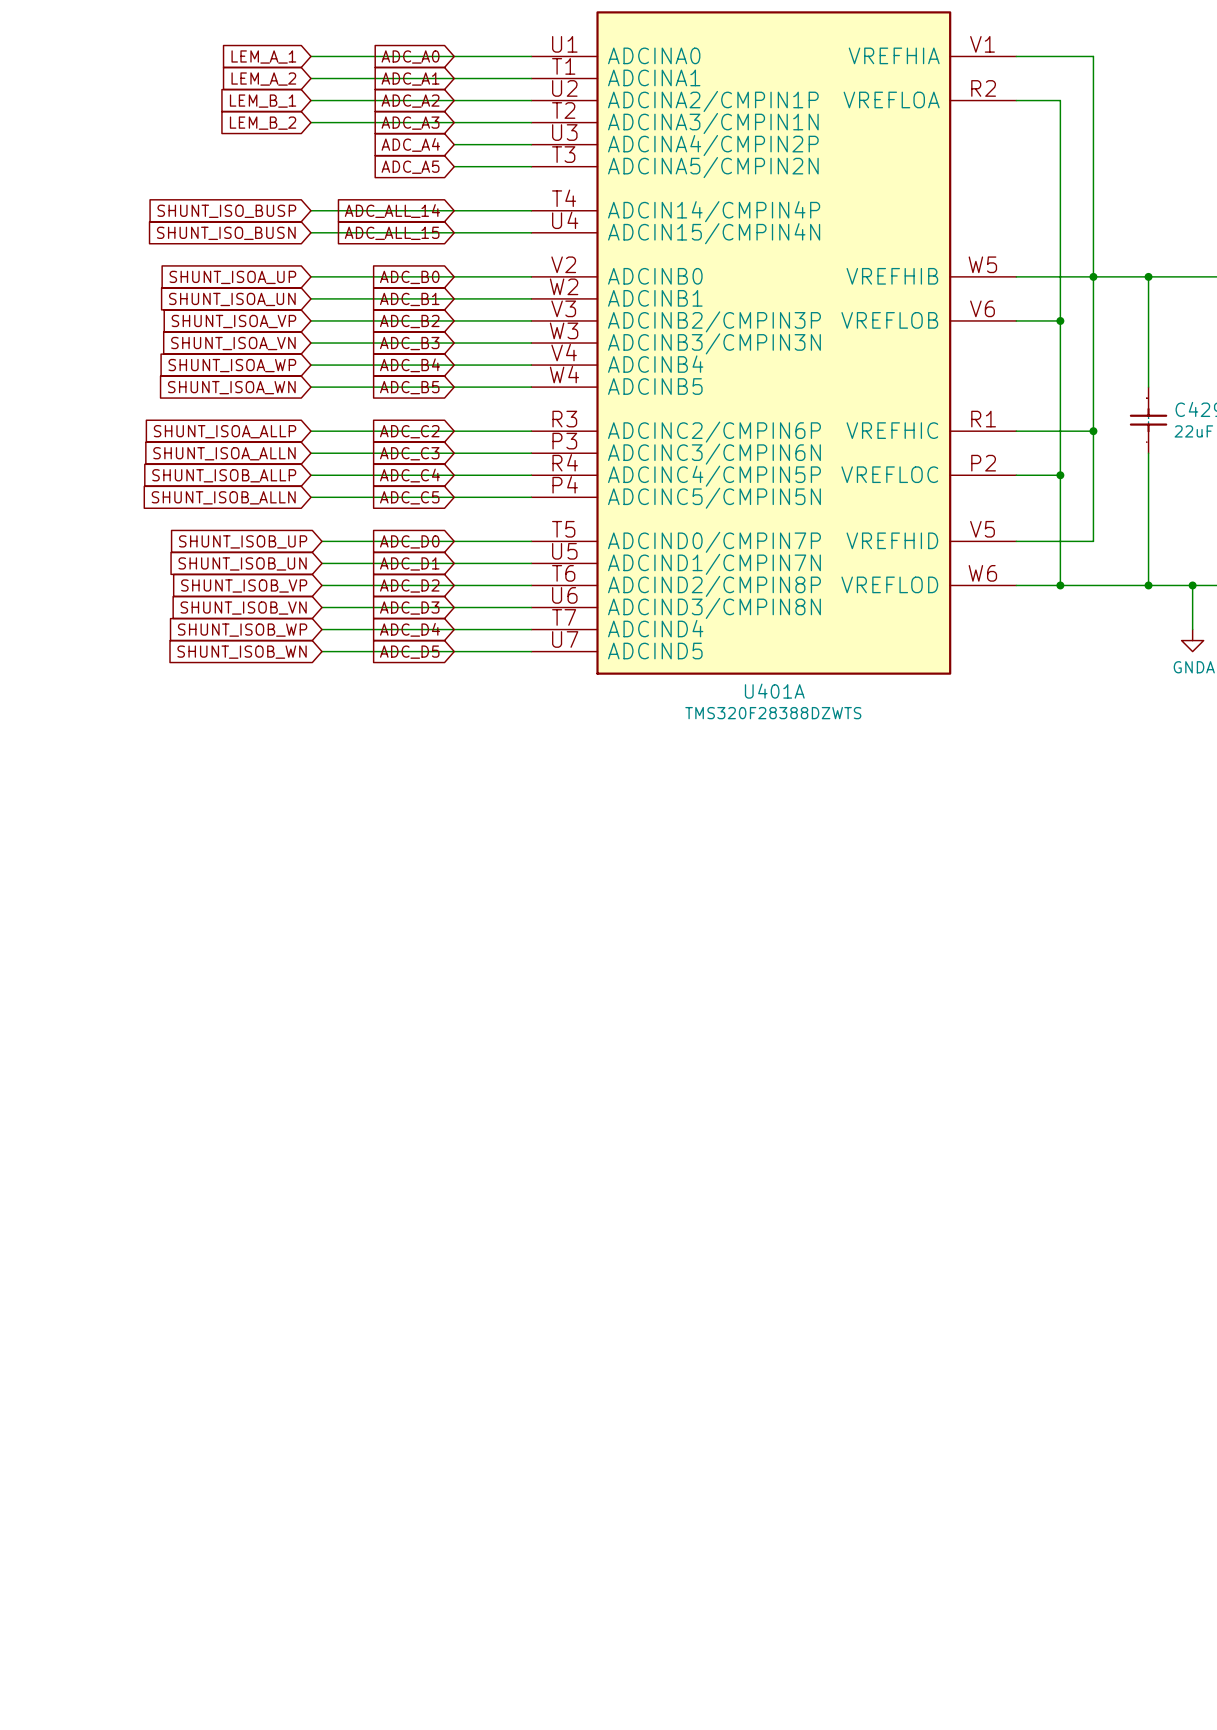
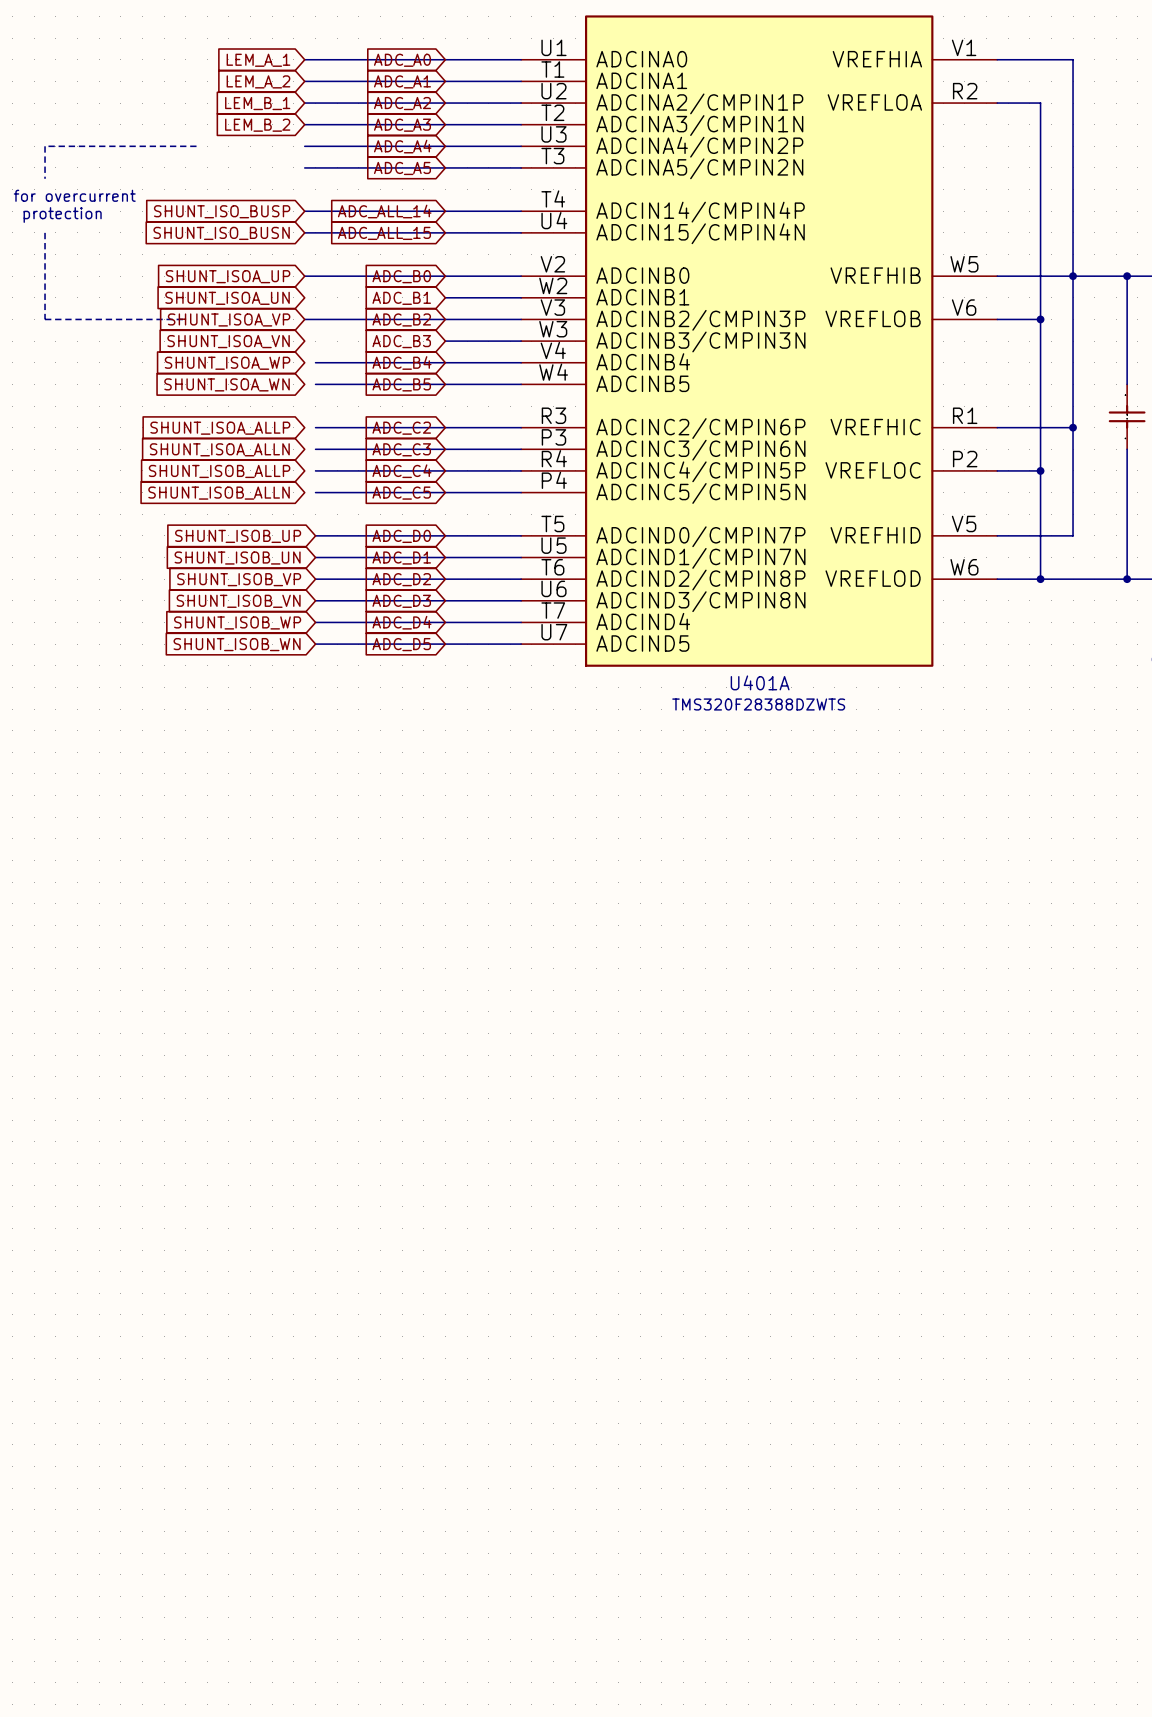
line: none -> (196, 146) (45, 146) (45, 178)
text: none -> for overcurrent (74, 195)
text: none -> protection (62, 215)
line: none -> (45, 232) (45, 319) (185, 319)
wire: (310, 298) (454, 298) -> (304, 167) (445, 167)
wire: (310, 343) (454, 343) -> (304, 146) (445, 146)
wire: (310, 365) (321, 365) -> none
wire: (310, 387) (321, 387) -> none
wire: (310, 431) (321, 431) -> none
wire: (310, 453) (321, 453) -> none
wire: (310, 475) (321, 475) -> none
wire: (310, 497) (321, 497) -> none

